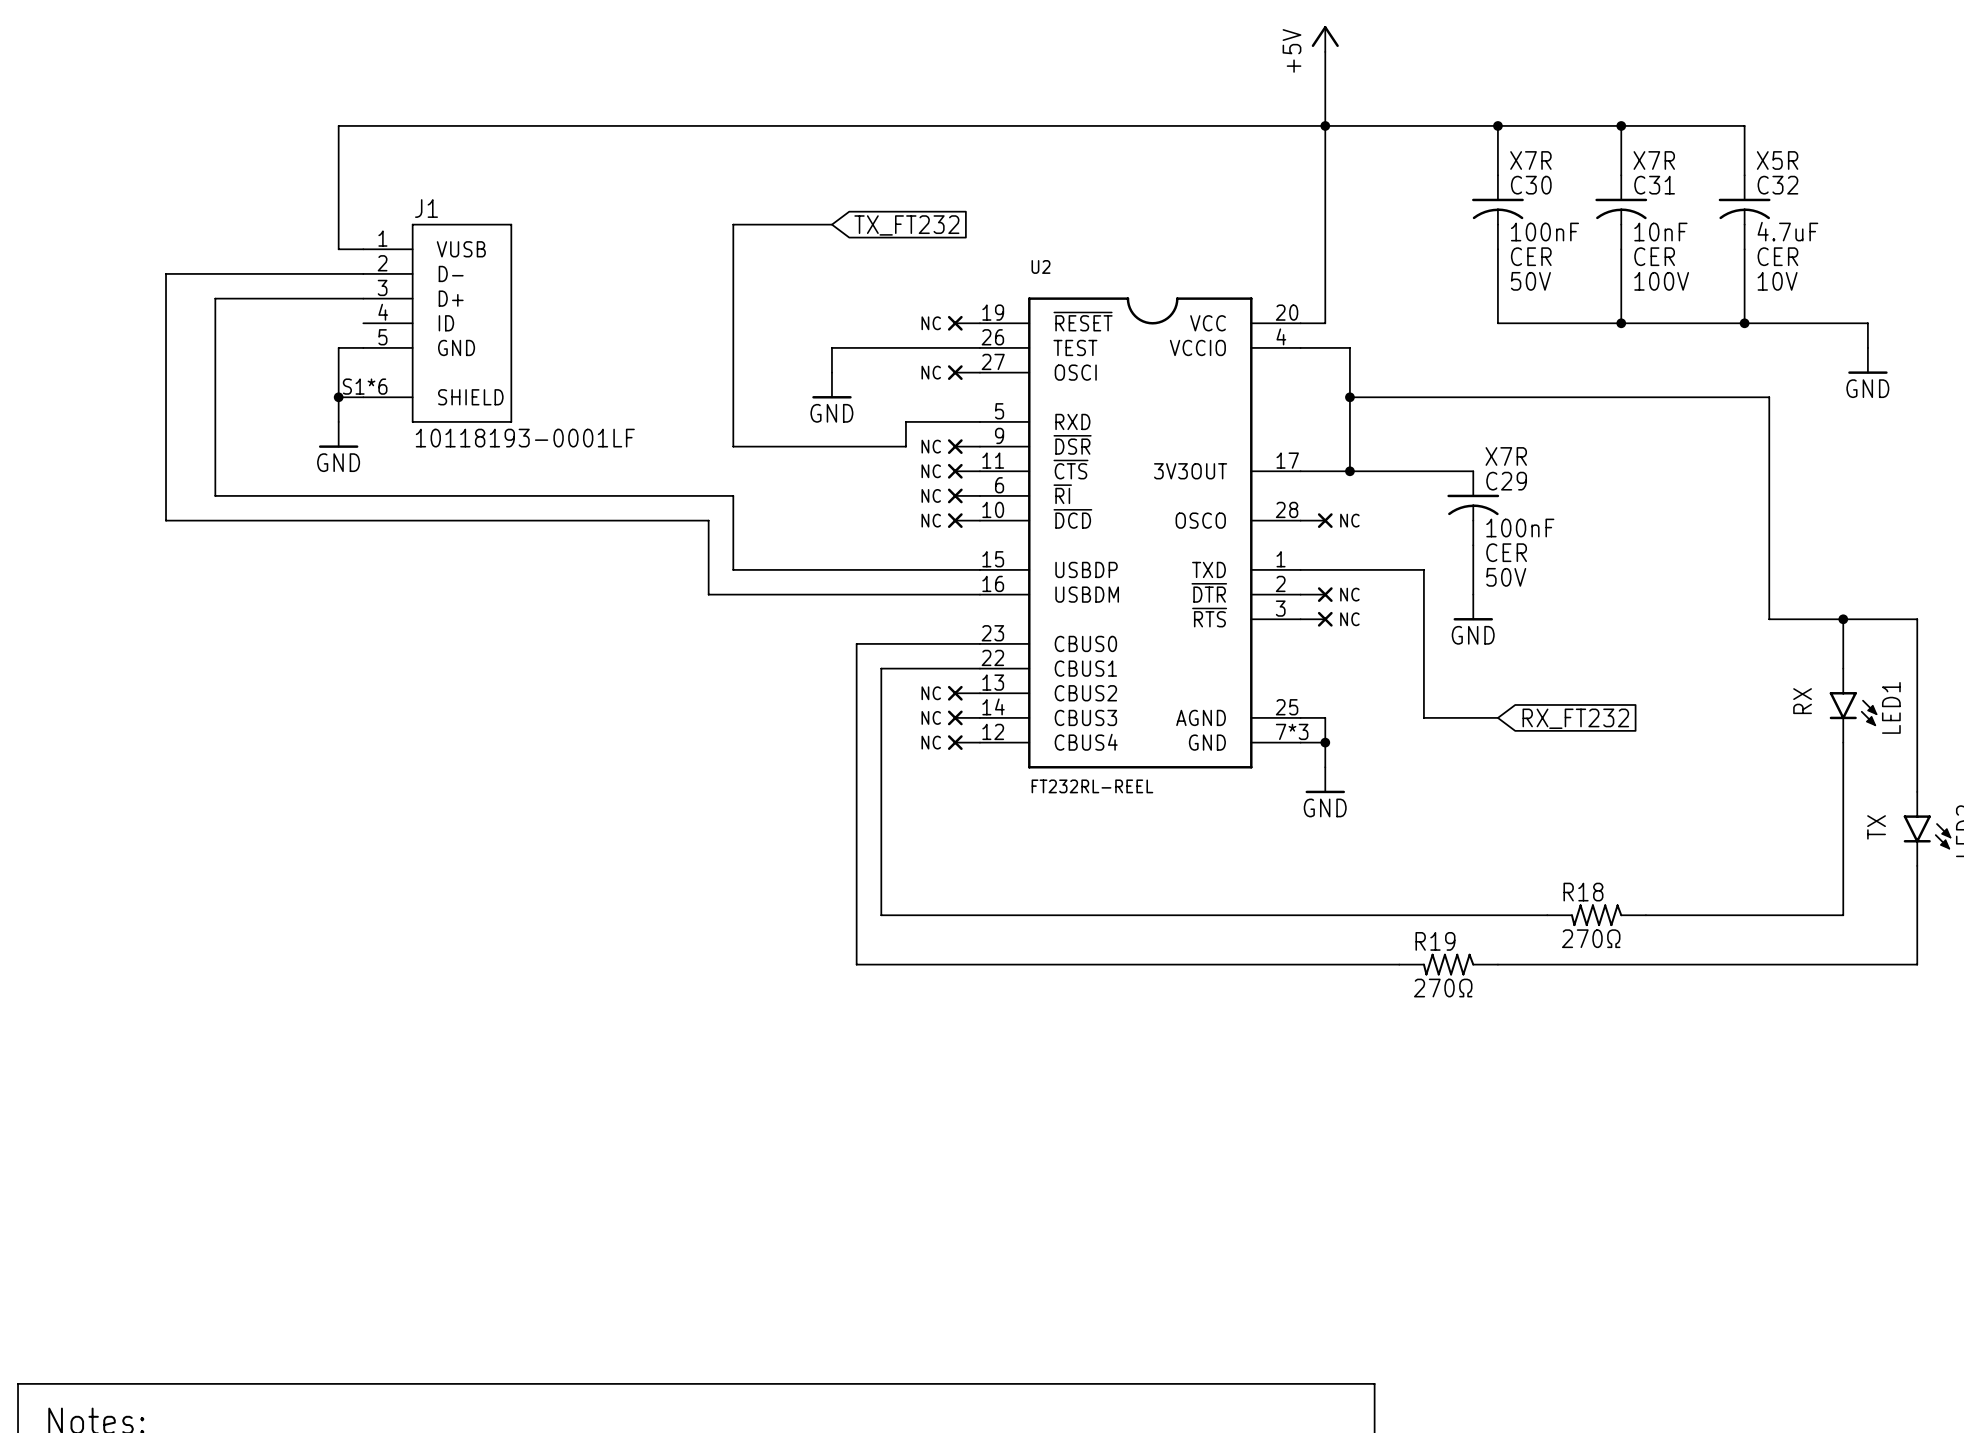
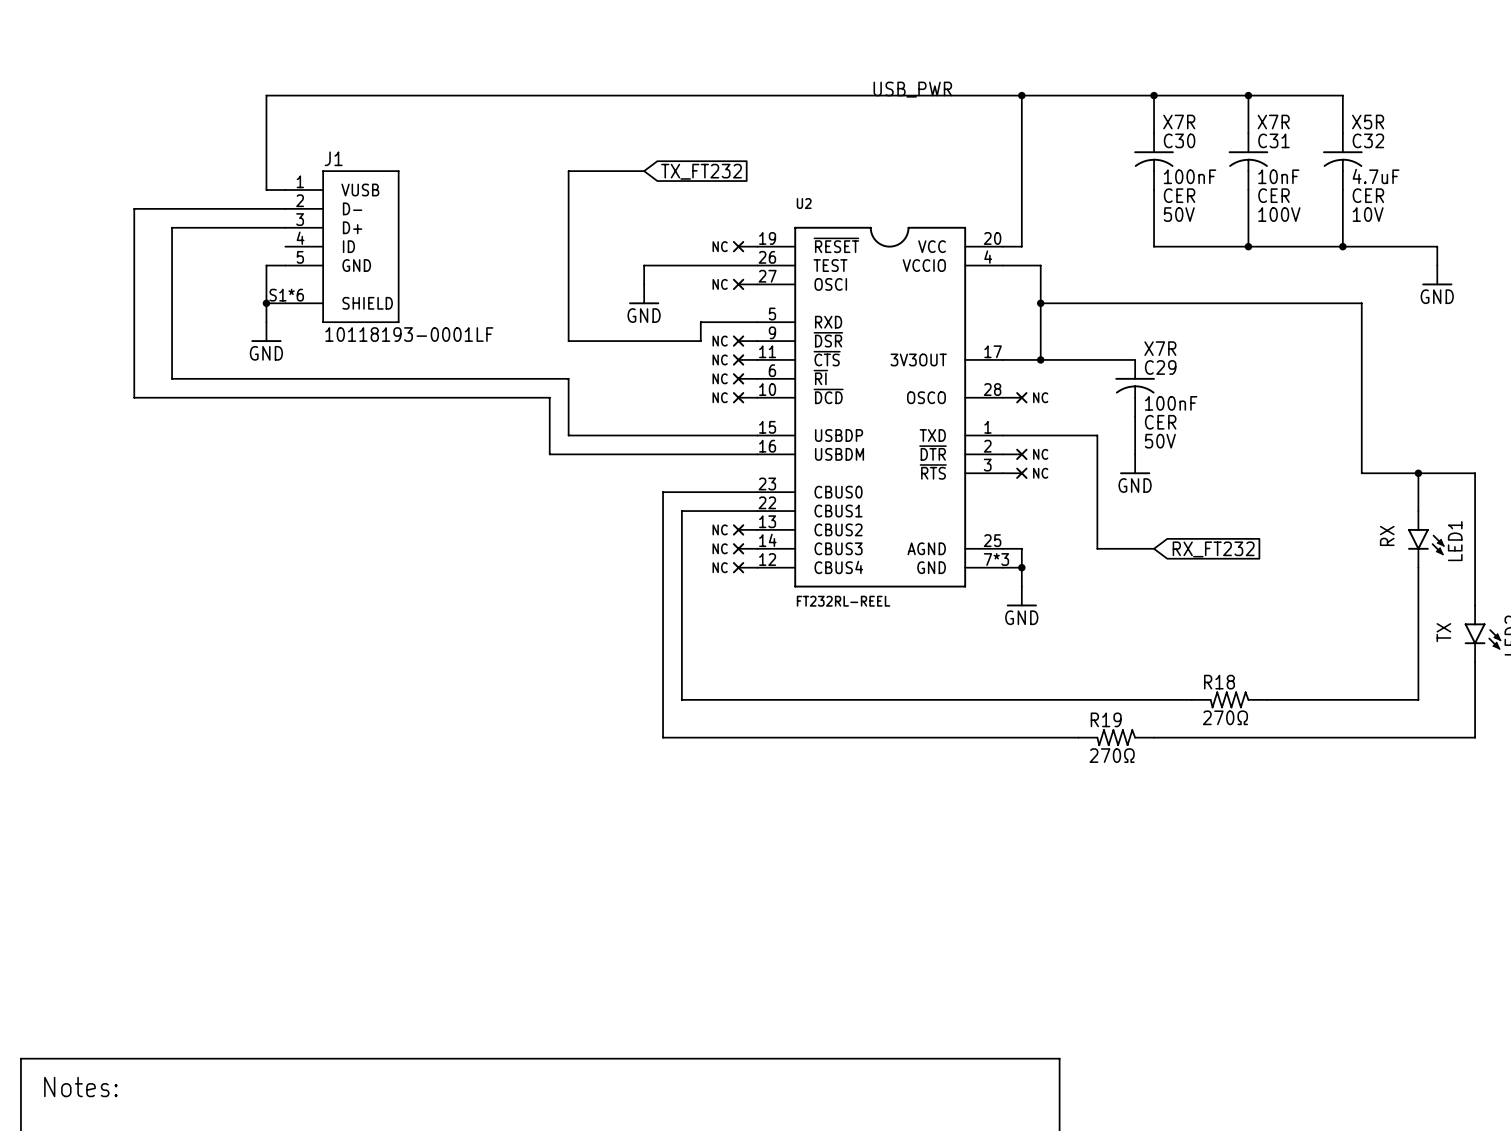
power symbol: +5V (1325, 39) -> none
wire: (1325, 51) (1325, 125) -> none
label: none -> USB_PWR (912, 89)

